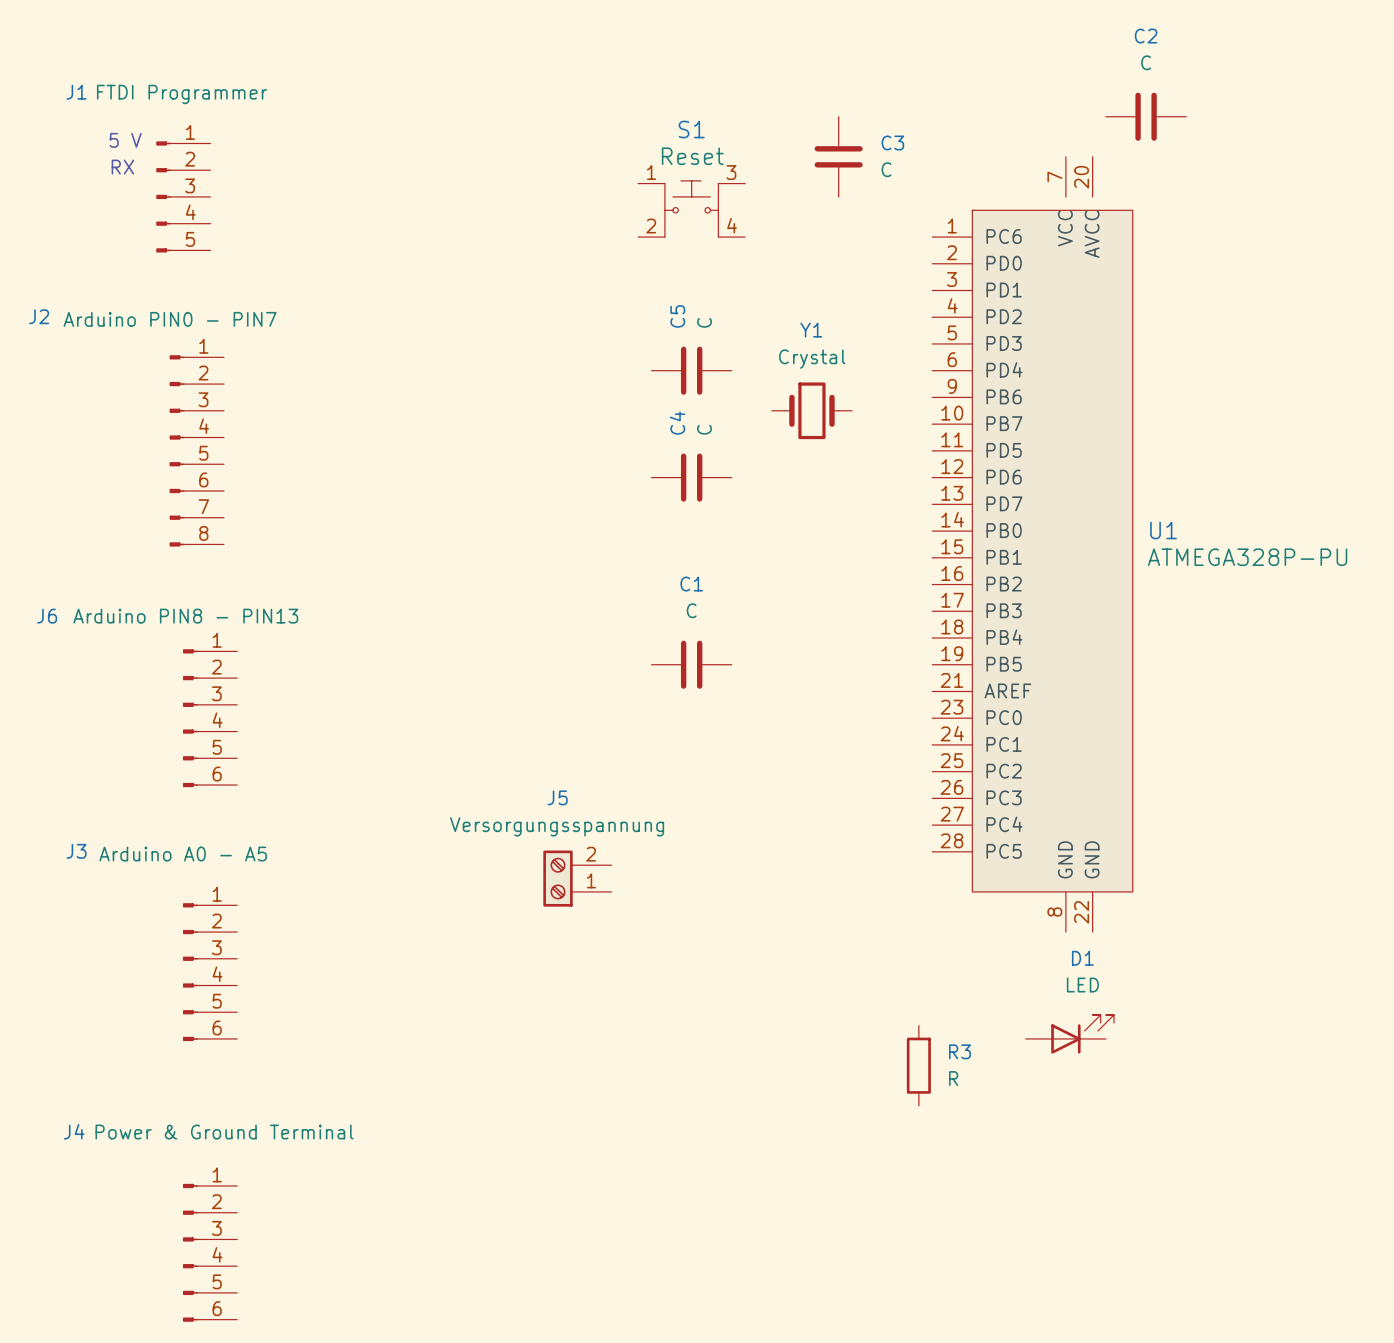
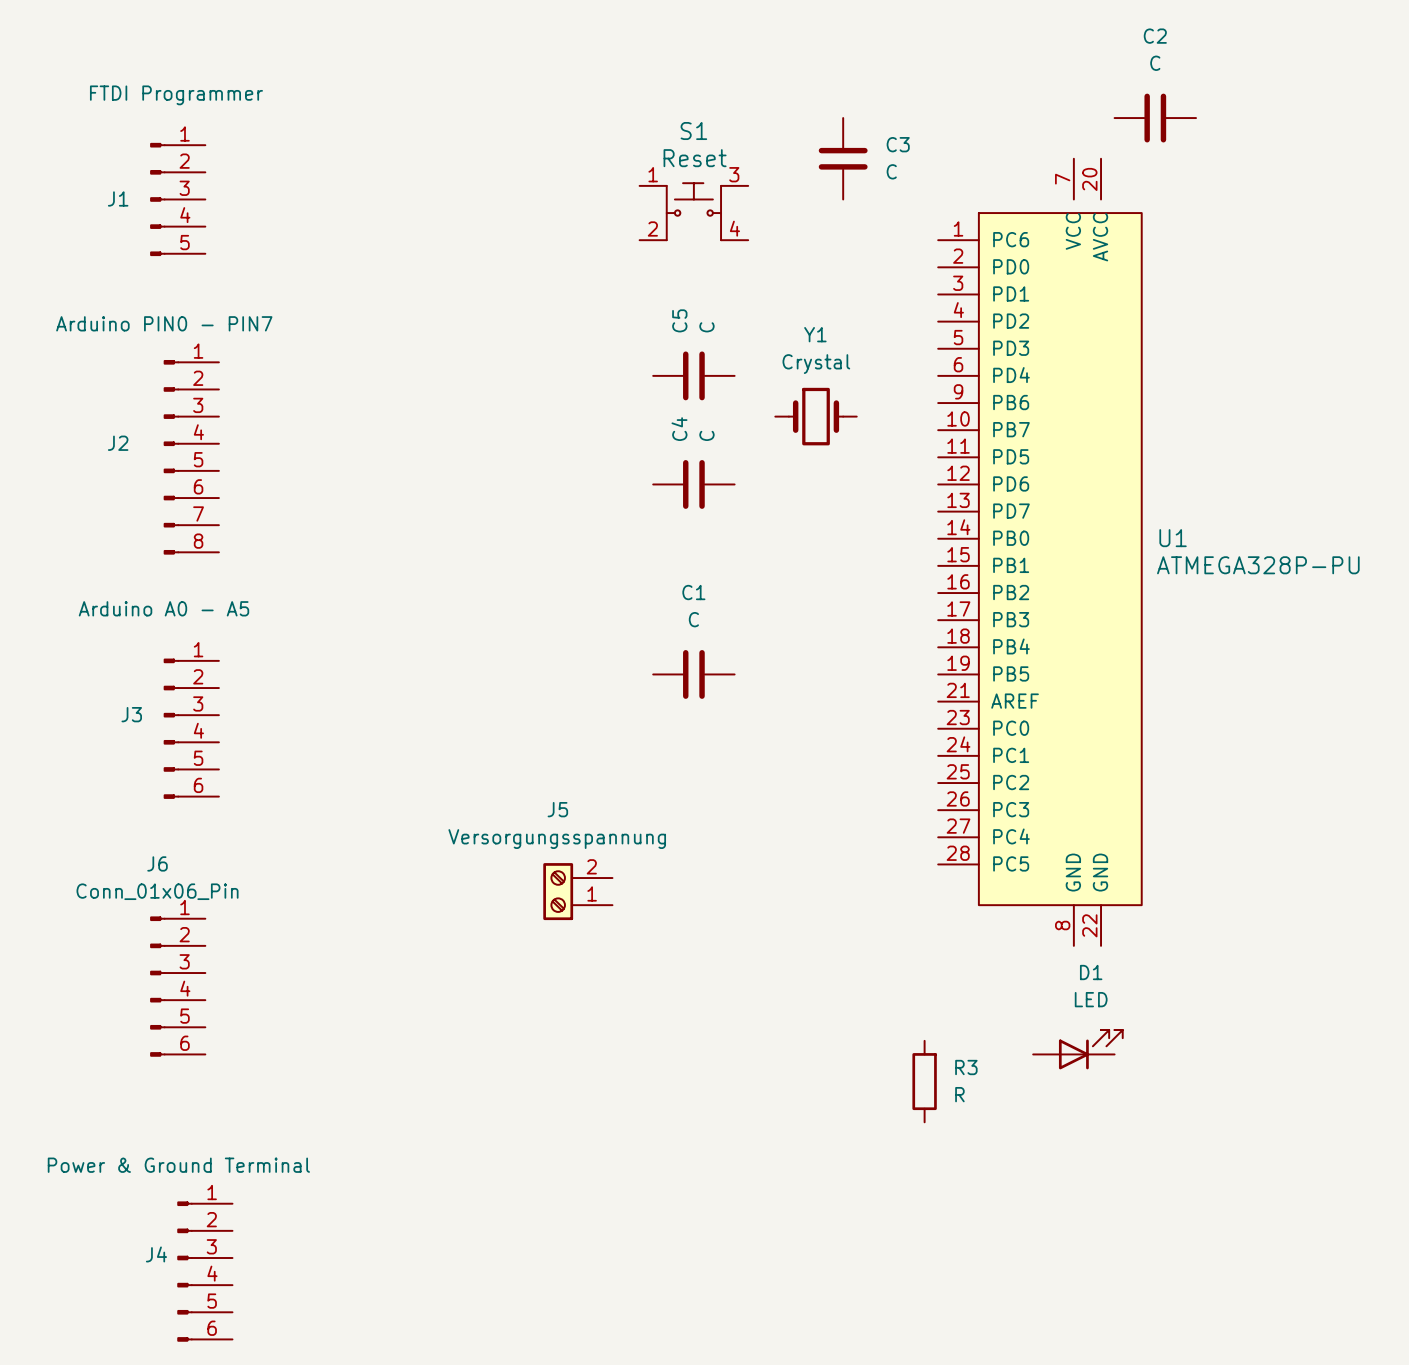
J1 name position: J1 (76, 92) -> J1 (118, 198)
text: 5 V (125, 140) -> none
text: RX (122, 167) -> none
J2 name position: J2 (39, 316) -> J2 (118, 443)
J6 name position: J6 (47, 616) -> J6 (157, 863)
J6 value: Arduino PIN8 - PIN13 (185, 616) -> Conn_01x06_Pin (157, 891)
J6 position: (210, 718) -> (177, 986)
J3 name position: J3 (76, 851) -> J3 (131, 714)
J3 position: (210, 972) -> (191, 728)
J4 name position: J4 (74, 1131) -> J4 (156, 1254)
J4 value position: Power & Ground Terminal (224, 1132) -> Power & Ground Terminal (178, 1165)

